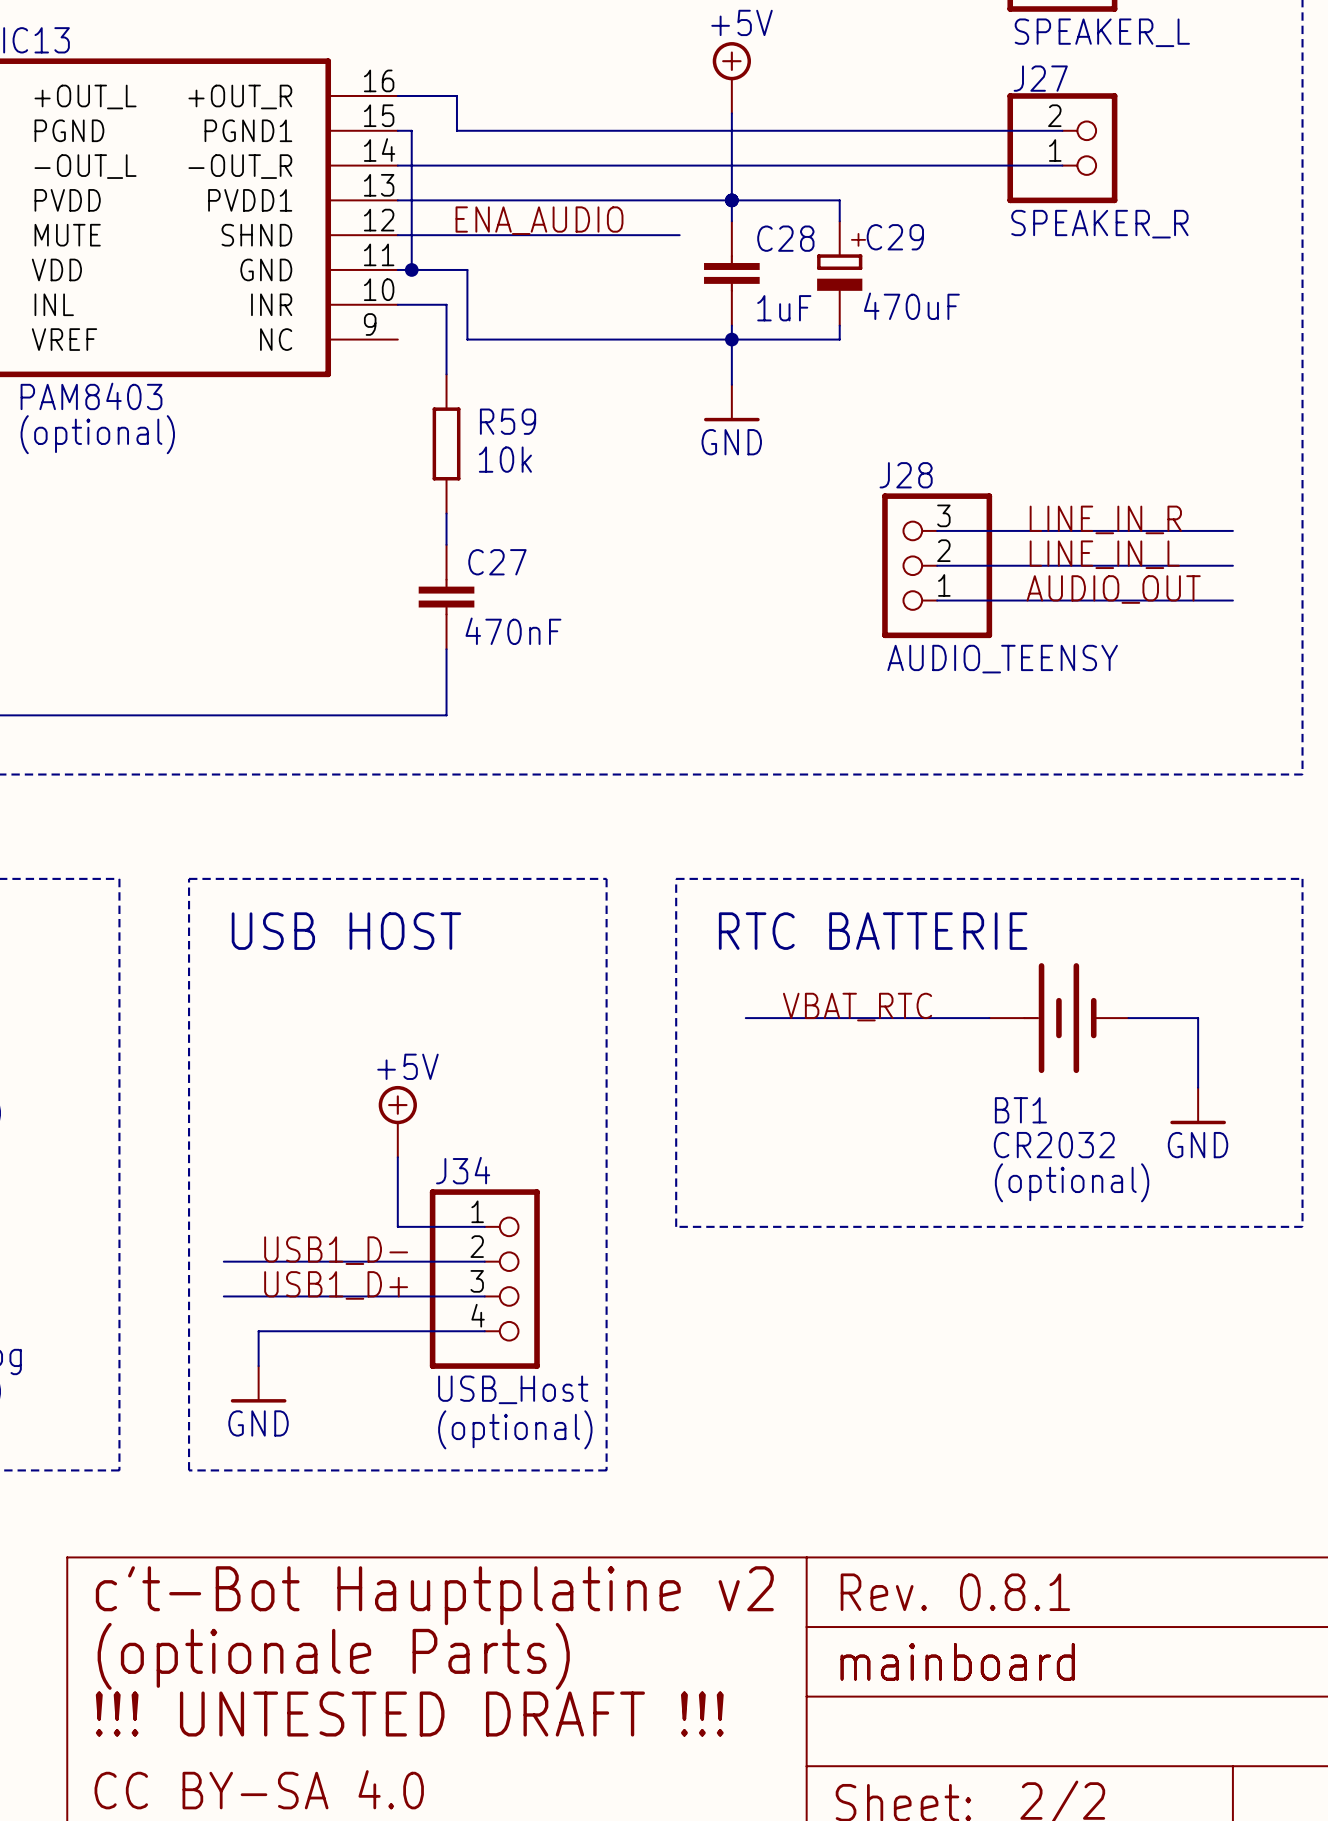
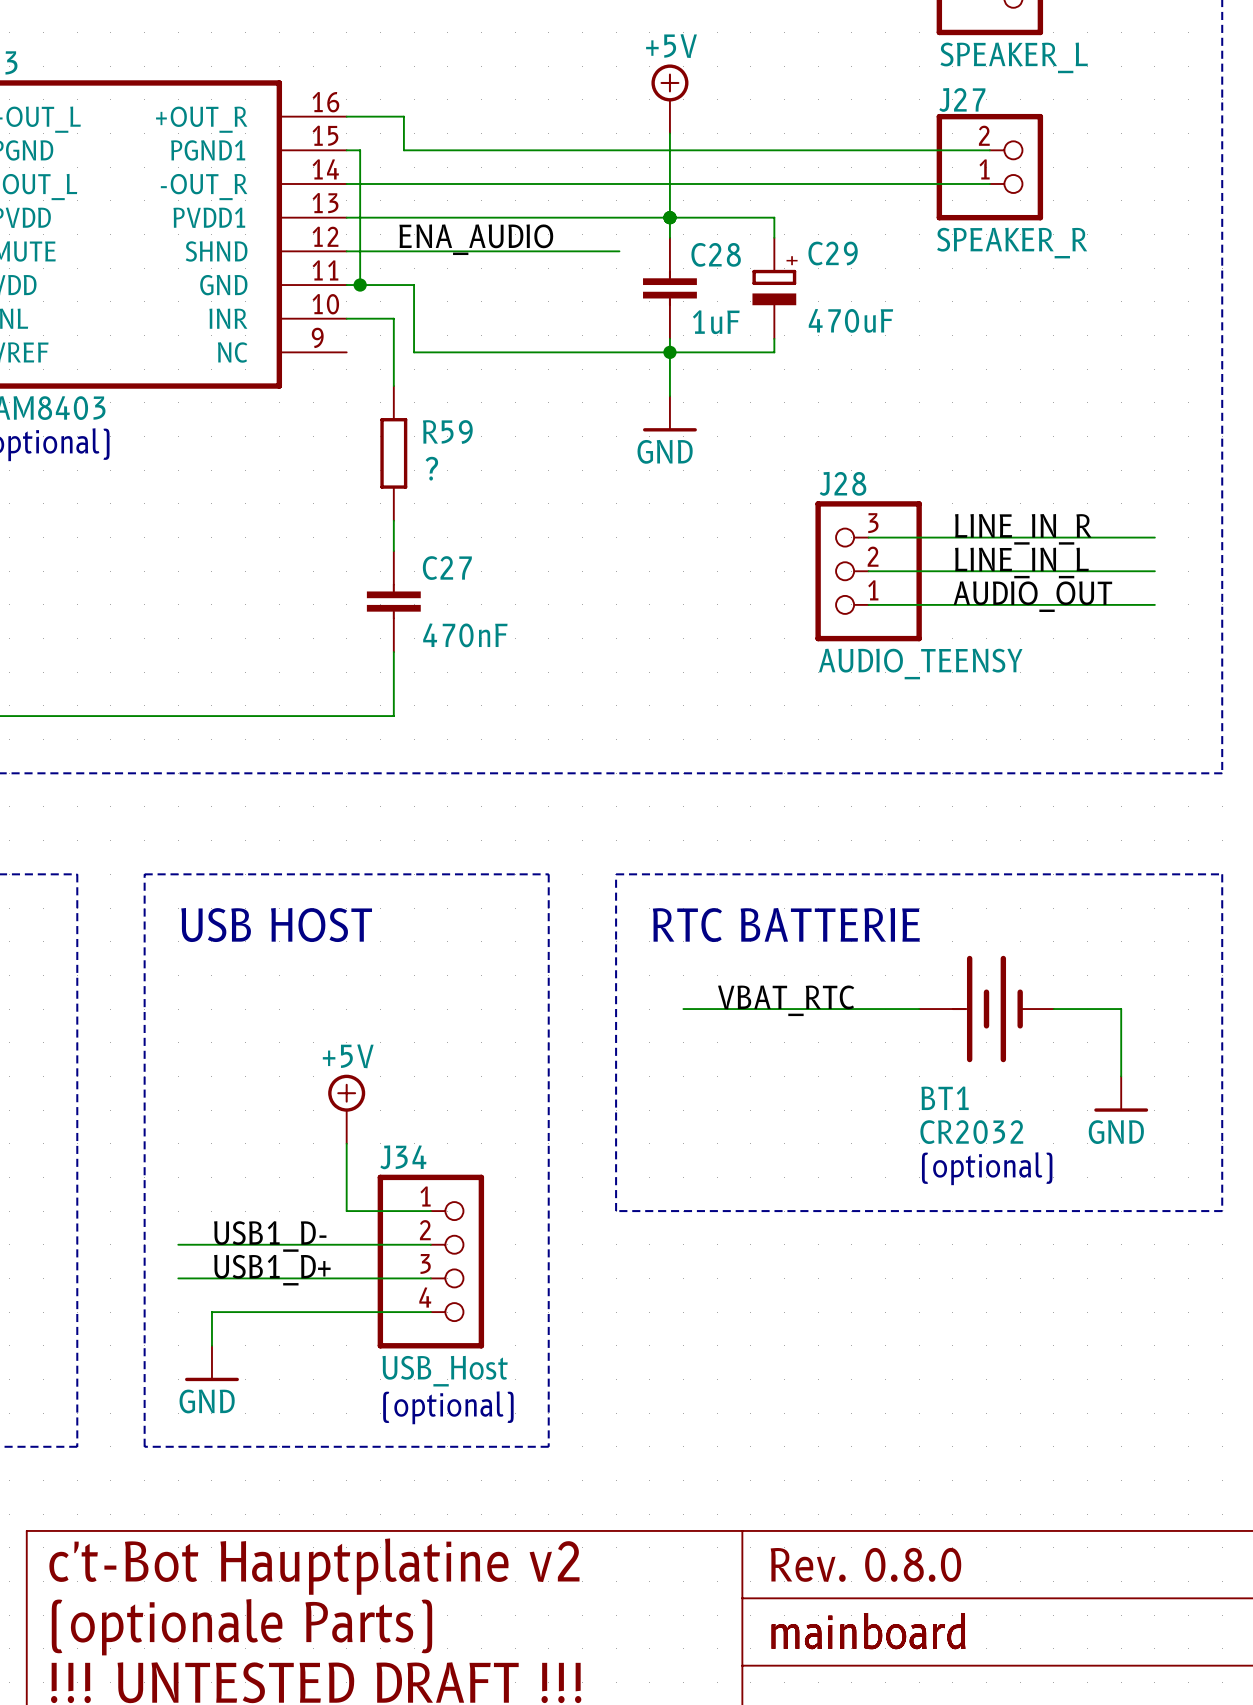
R59 value: 10k (505, 459) -> ? (431, 468)
text: Rev. 0.8.1 (955, 1592) -> Rev. 0.8.0 (865, 1564)

